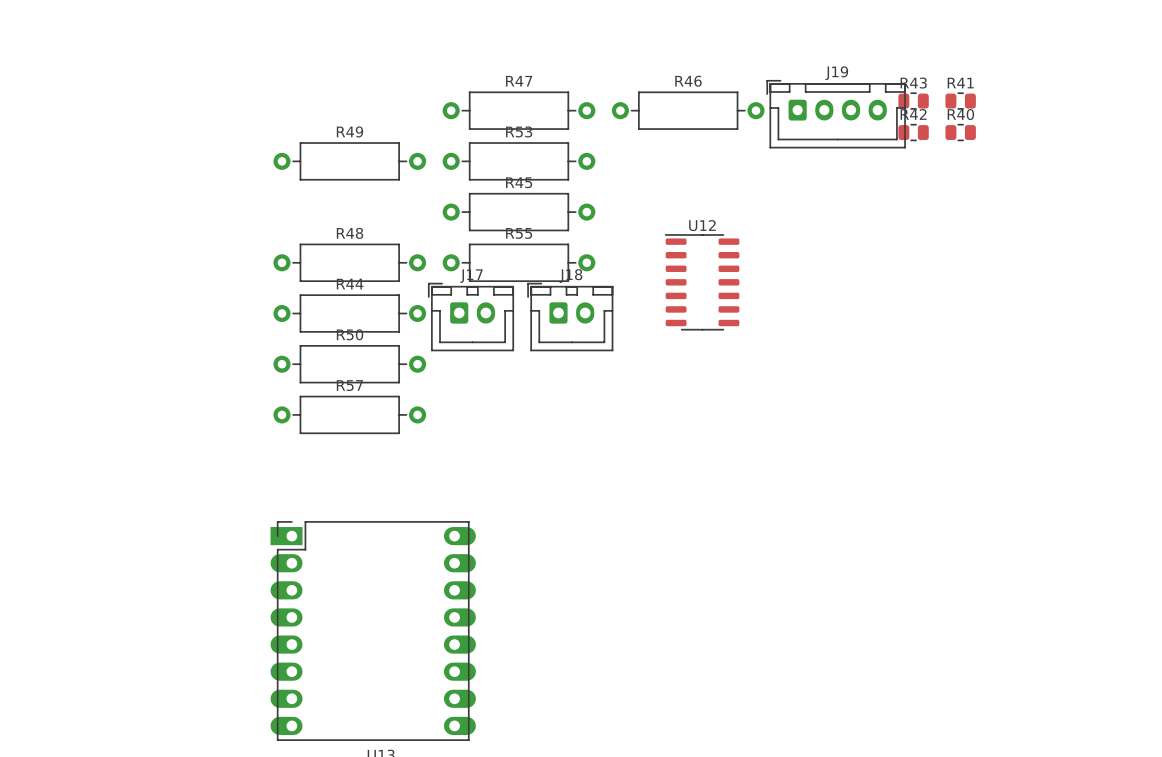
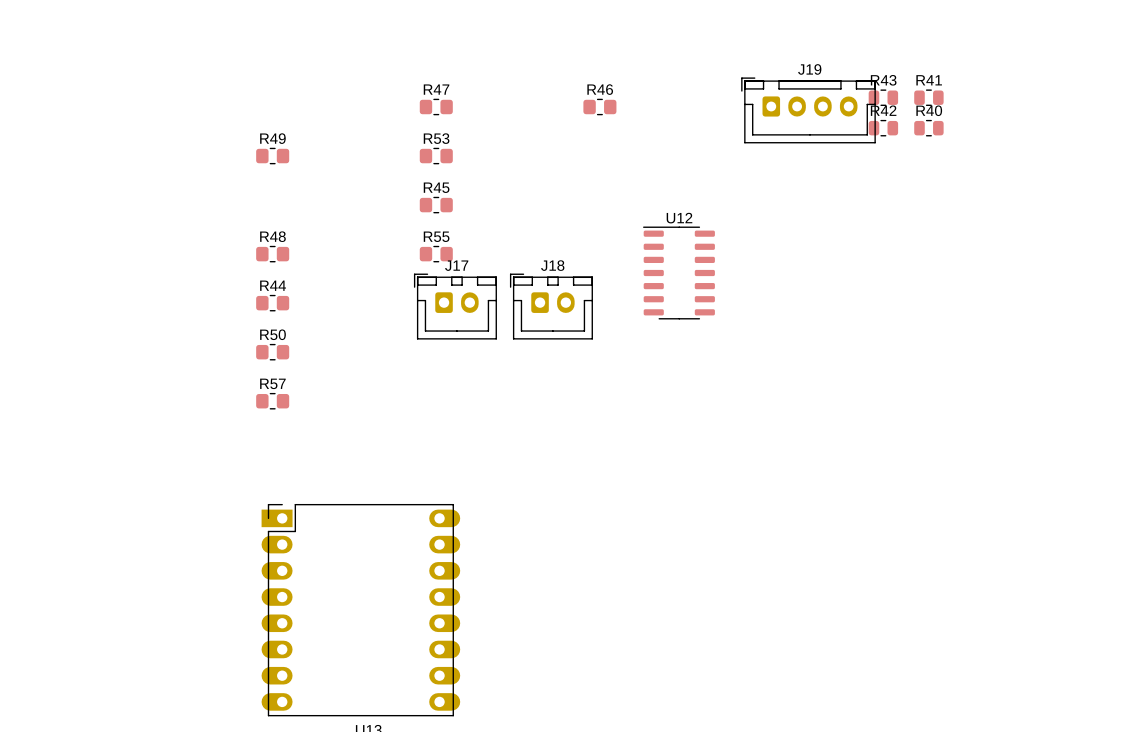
R47 footprint: [442, 91, 596, 130] -> [419, 98, 453, 116]
R46 footprint: [611, 91, 765, 130] -> [583, 98, 617, 116]
R49 footprint: [273, 142, 427, 181] -> [256, 147, 290, 165]
R53 footprint: [442, 142, 596, 181] -> [419, 147, 453, 165]
R45 footprint: [442, 193, 596, 232] -> [419, 196, 453, 214]
R48 footprint: [273, 243, 427, 282] -> [256, 245, 290, 263]
R55 footprint: [442, 243, 596, 282] -> [419, 245, 453, 263]
R44 footprint: [273, 294, 427, 333] -> [256, 294, 290, 312]
R50 footprint: [273, 345, 427, 384] -> [256, 343, 290, 361]
R57 footprint: [273, 395, 427, 434] -> [256, 393, 290, 410]

